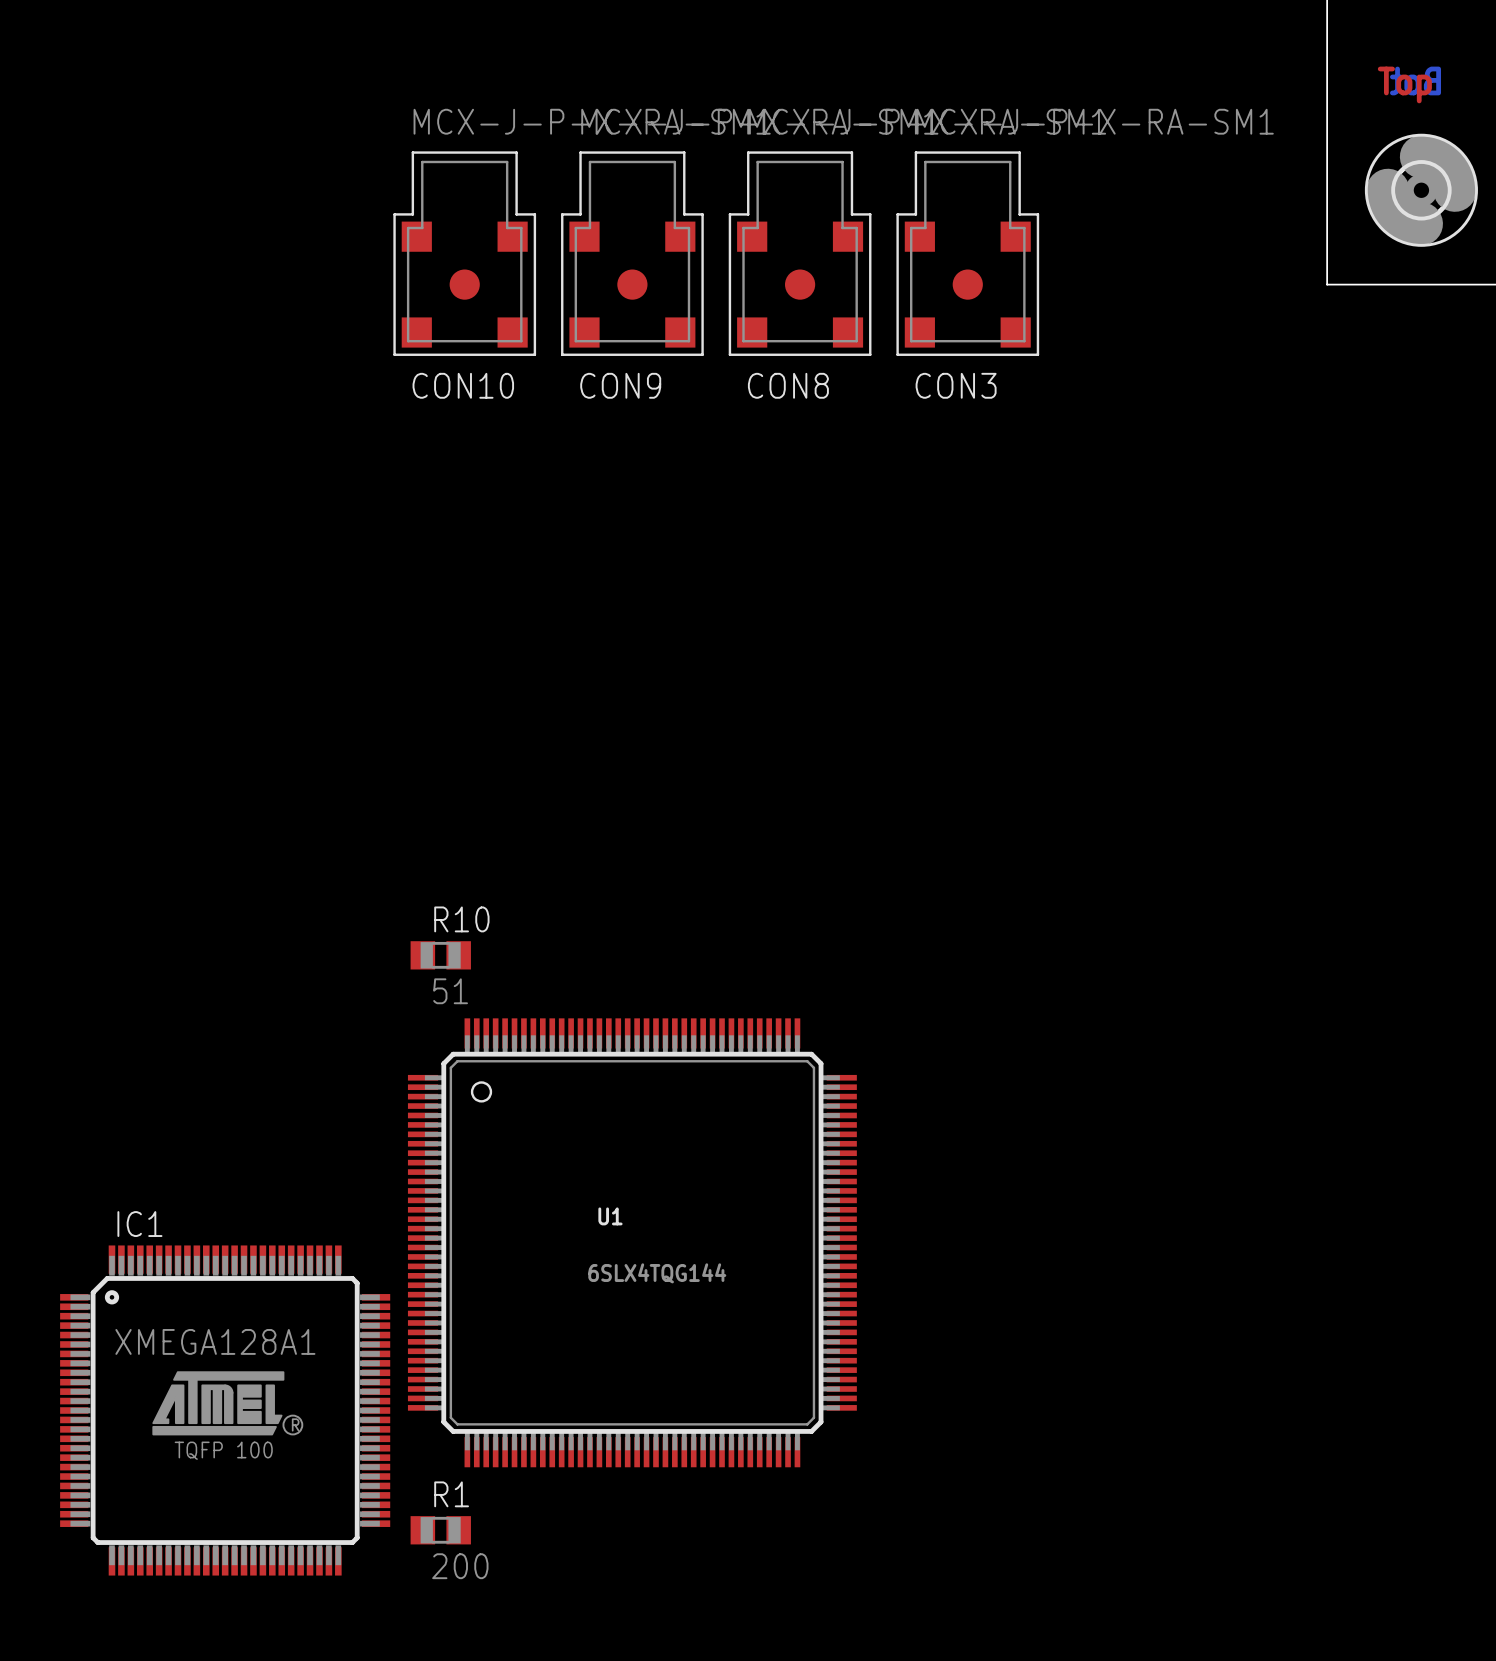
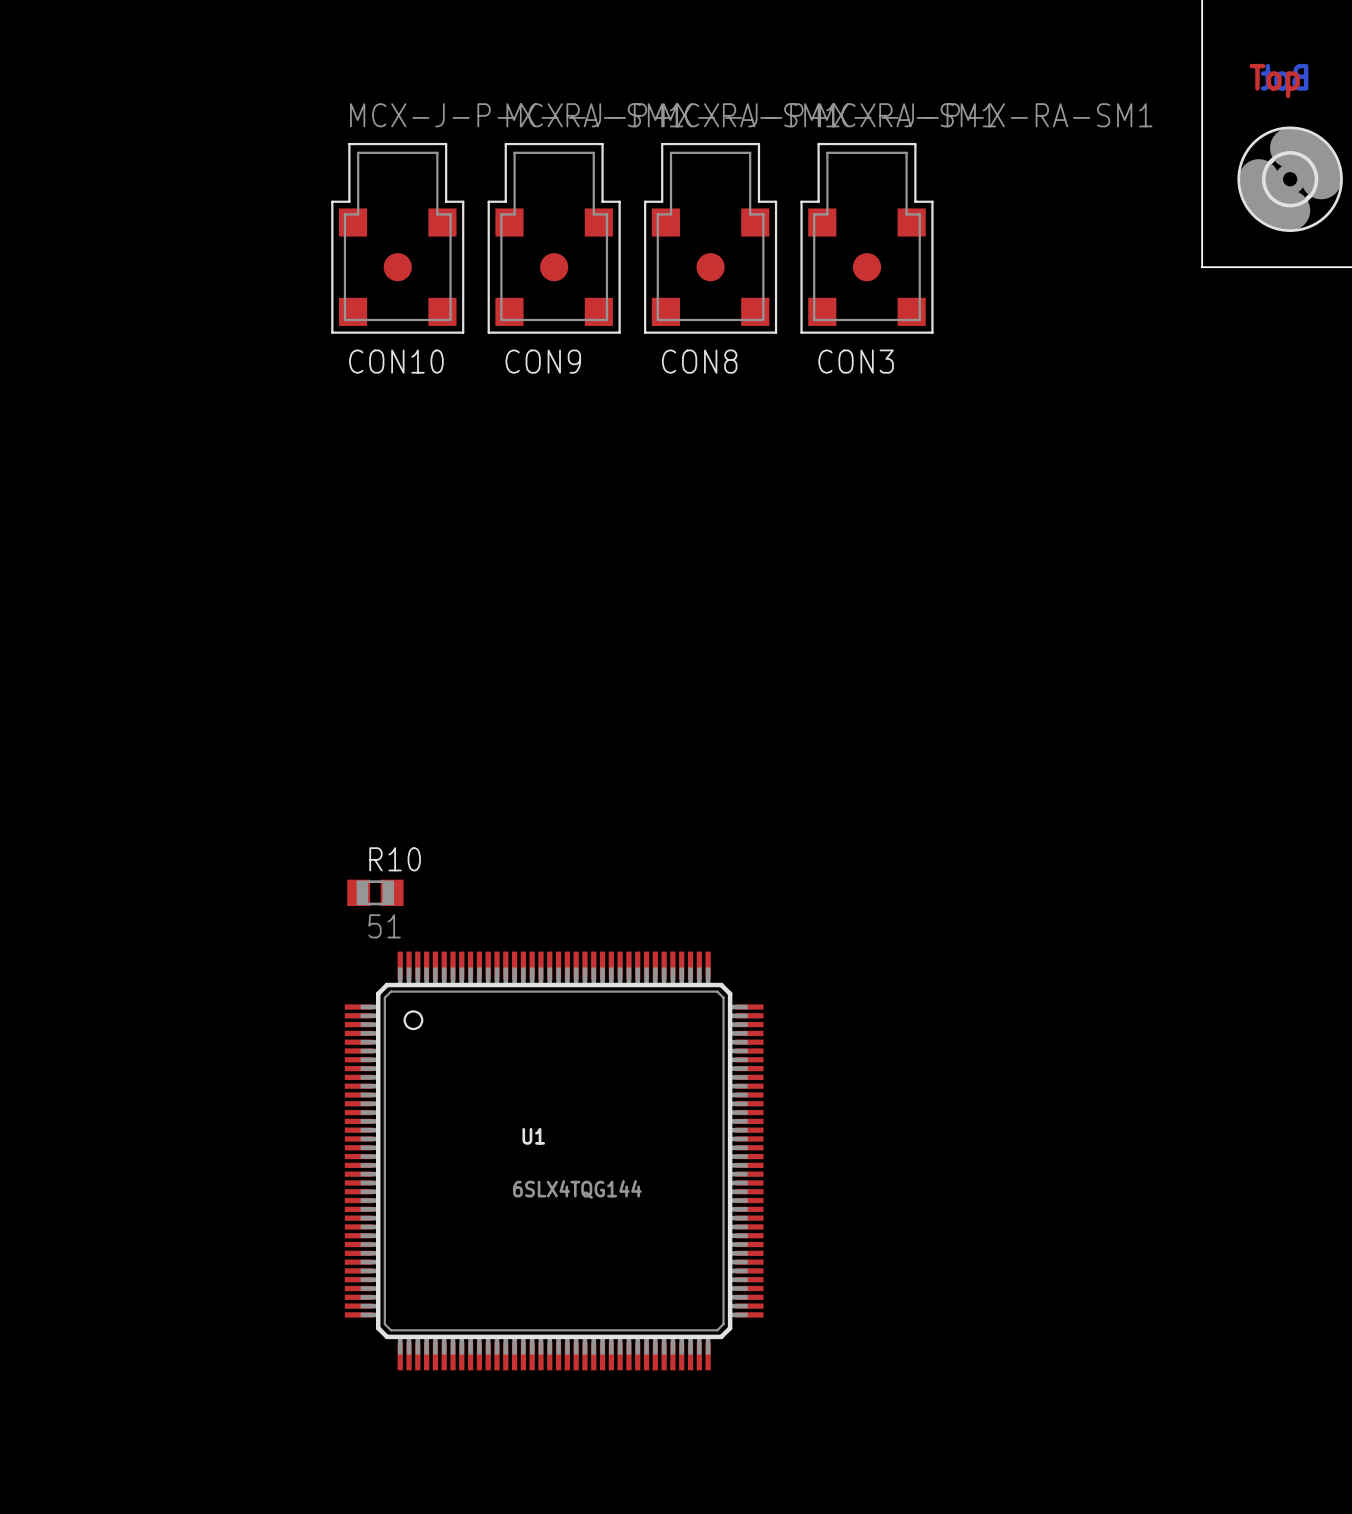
IC1: XMEGA128A1 (225, 1410) -> none
R1: 200 (440, 1530) -> none

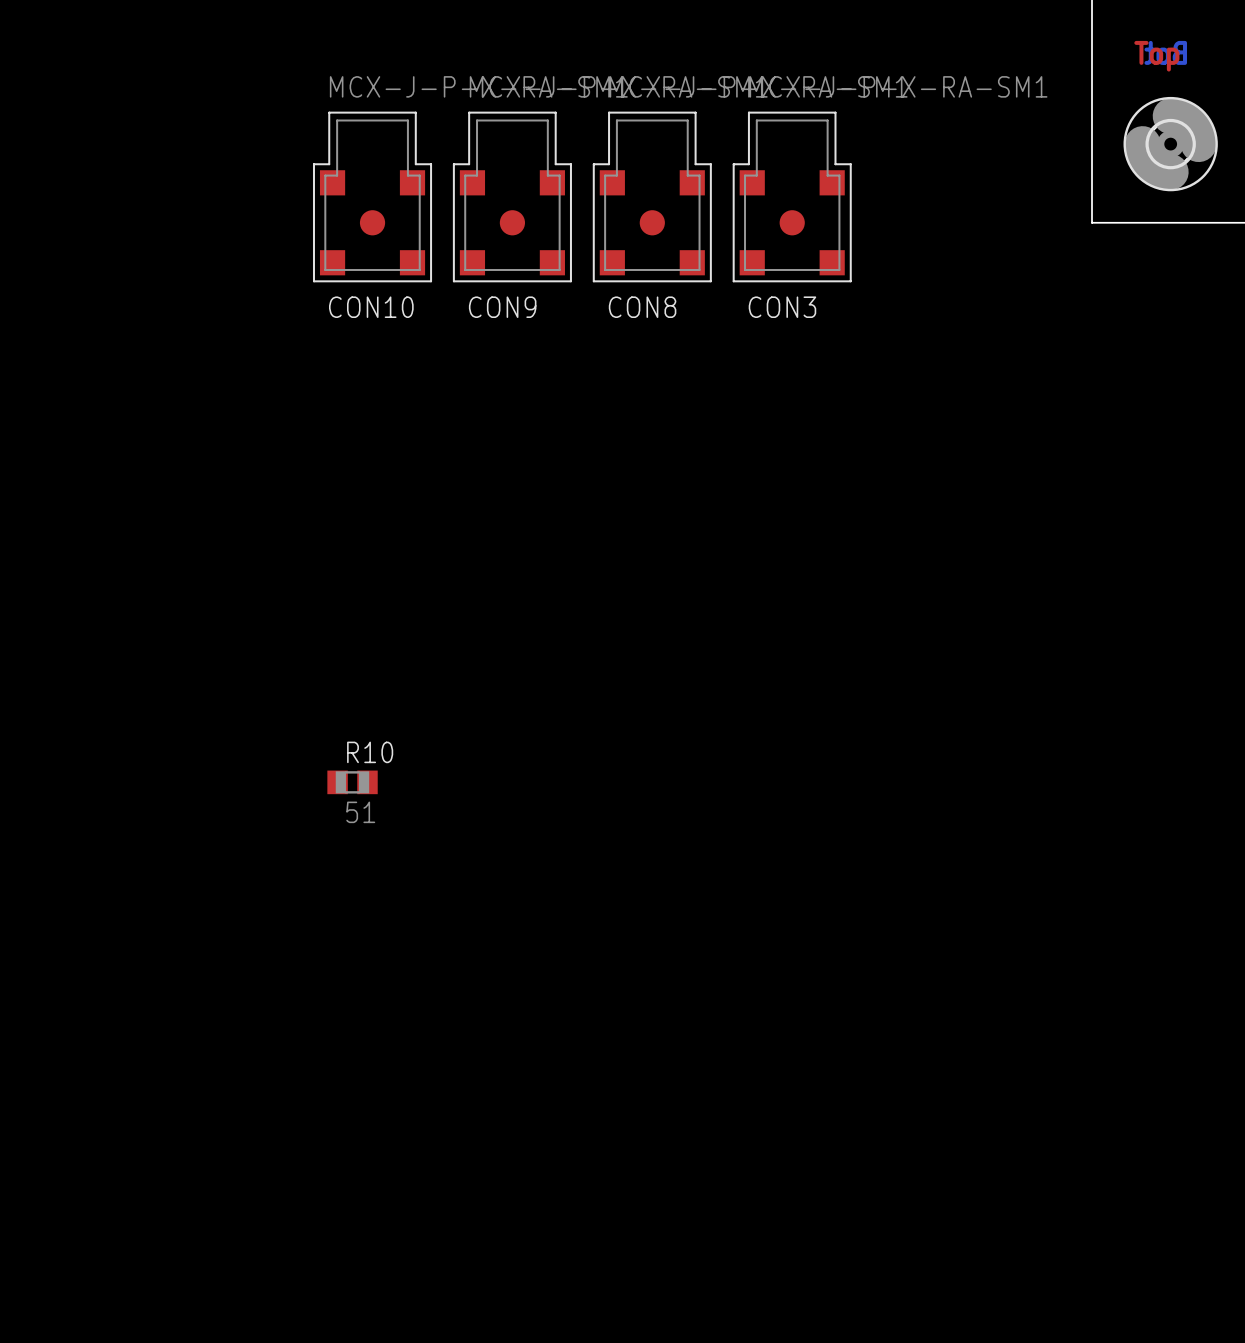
U1: 6SLX4TQG144 (554, 1160) -> none

